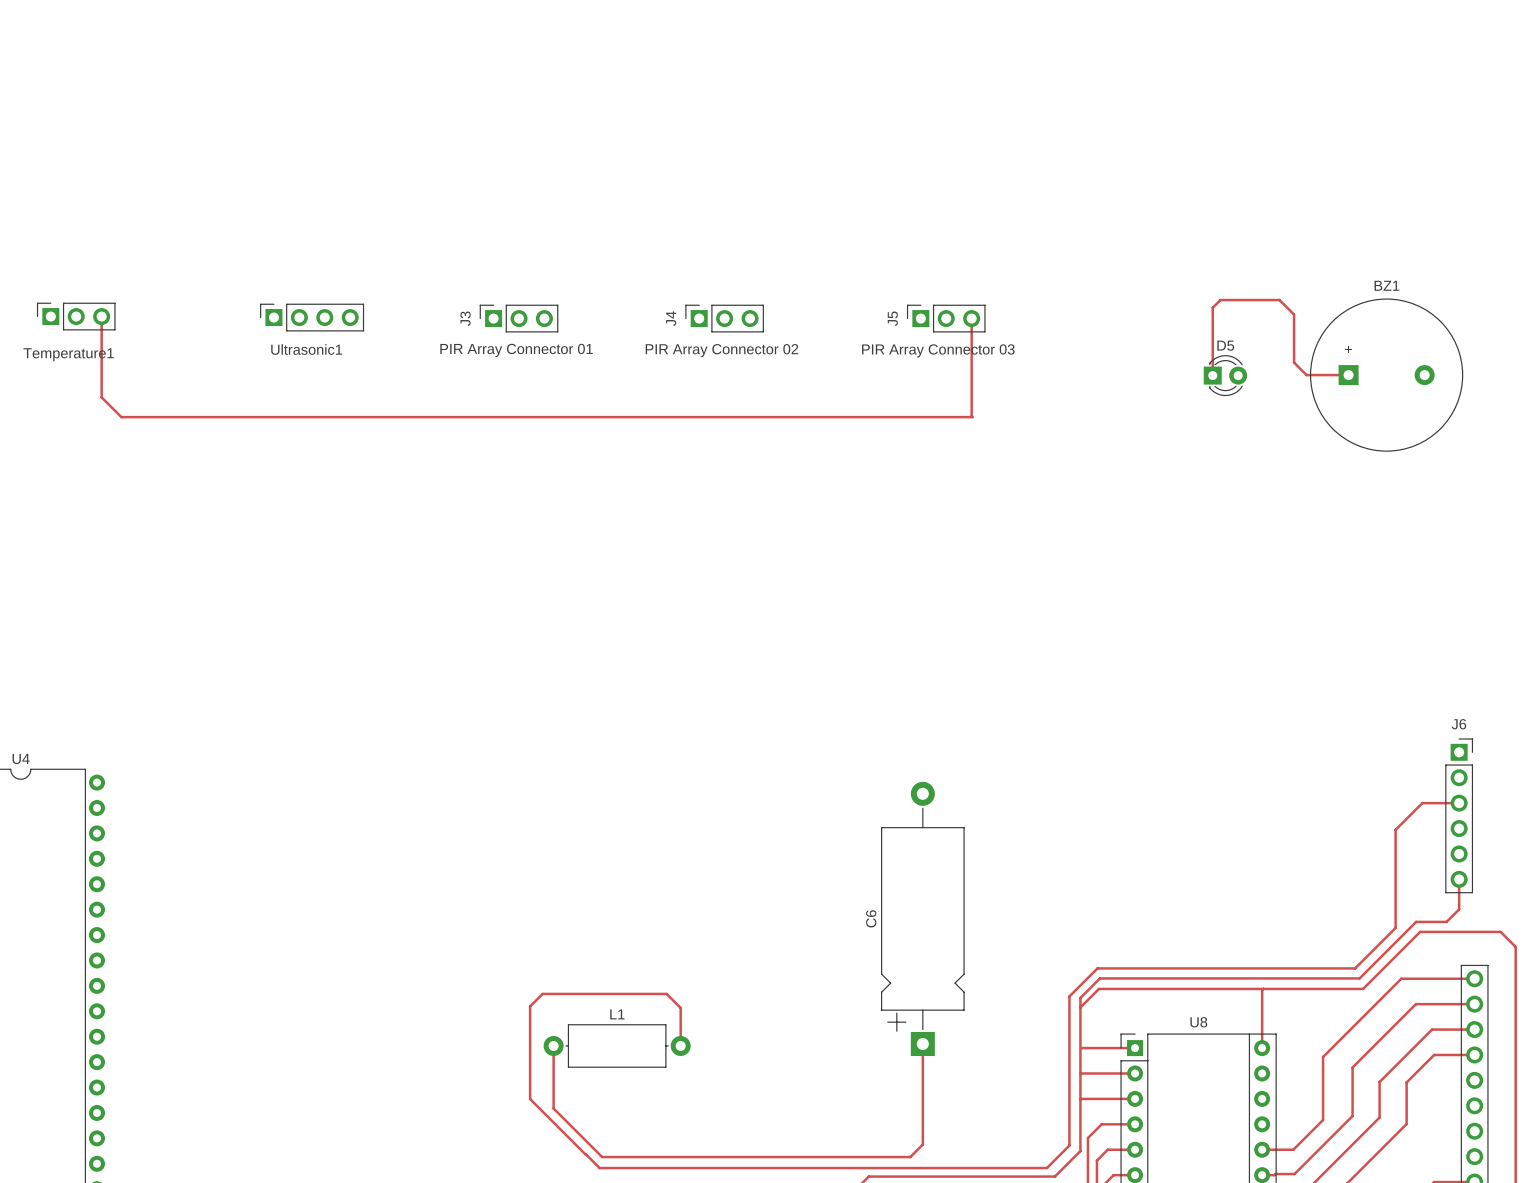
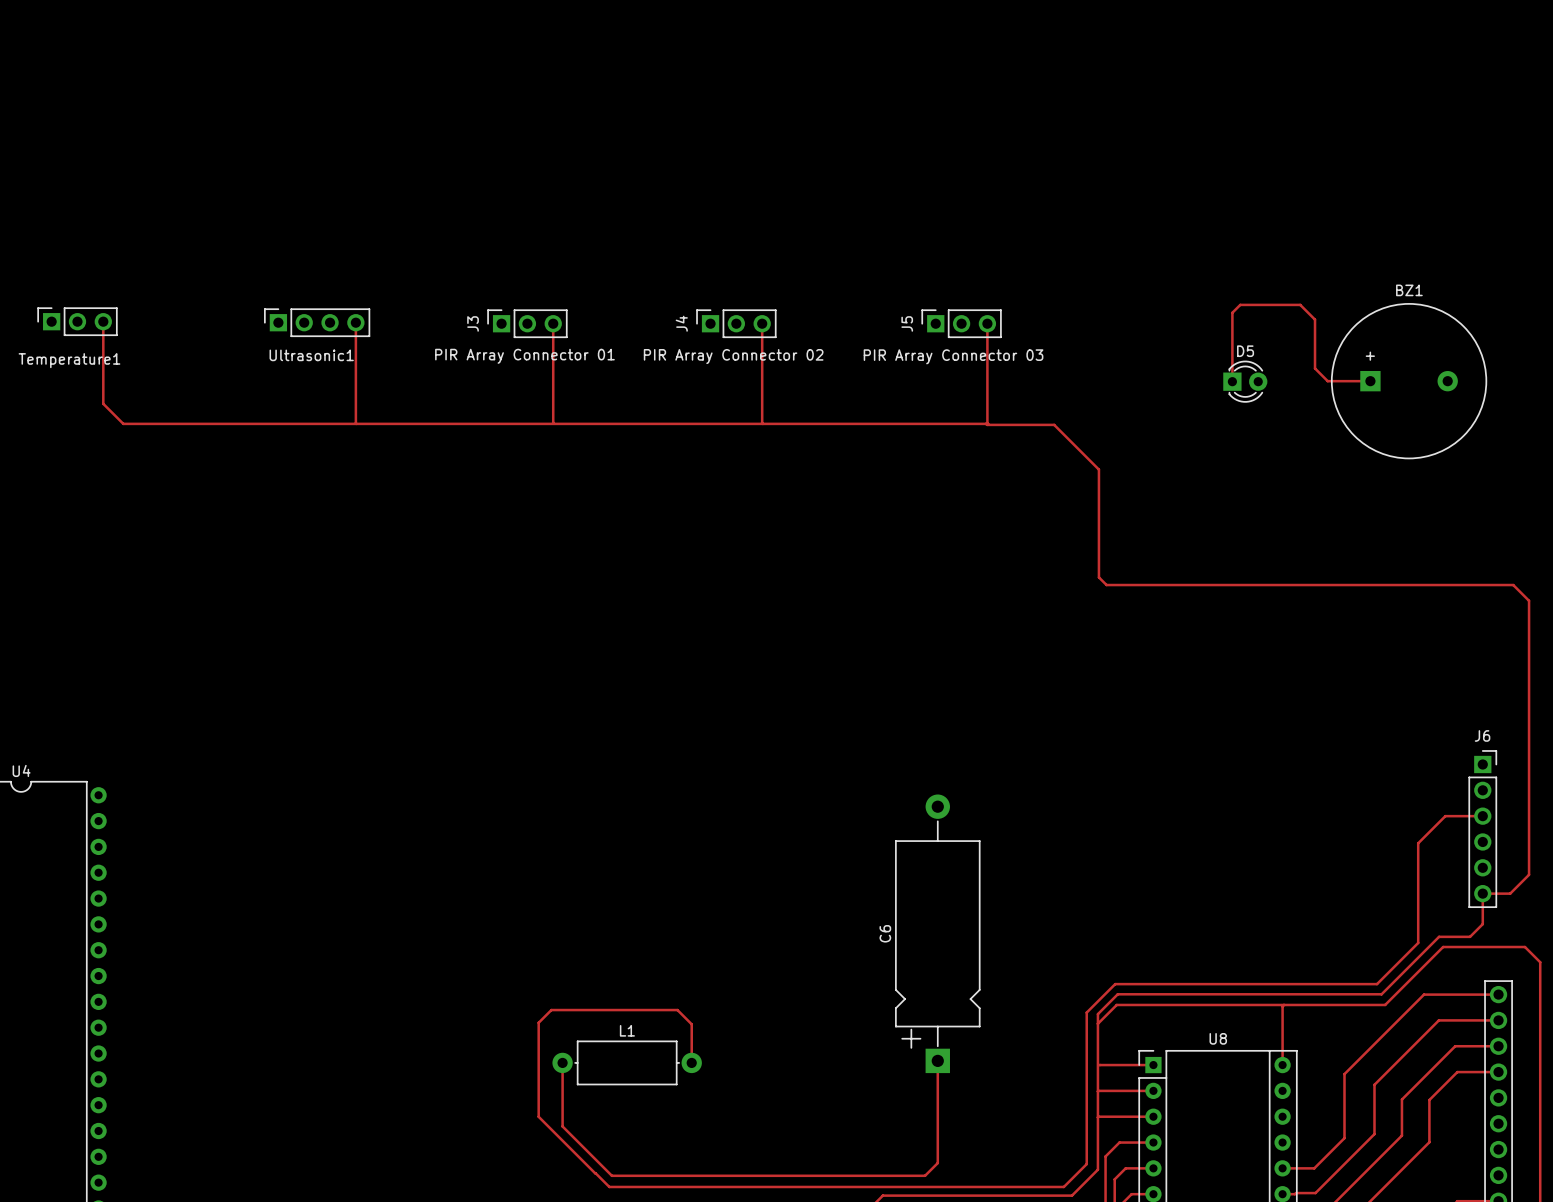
track: none -> (355, 322) (356, 423)
track: none -> (553, 323) (553, 423)
track: none -> (762, 323) (762, 423)
track: none -> (986, 423) (1054, 424) (1098, 469) (1098, 577) (1106, 585) (1513, 585) (1529, 600) (1529, 874) (1510, 893) (1482, 893)

